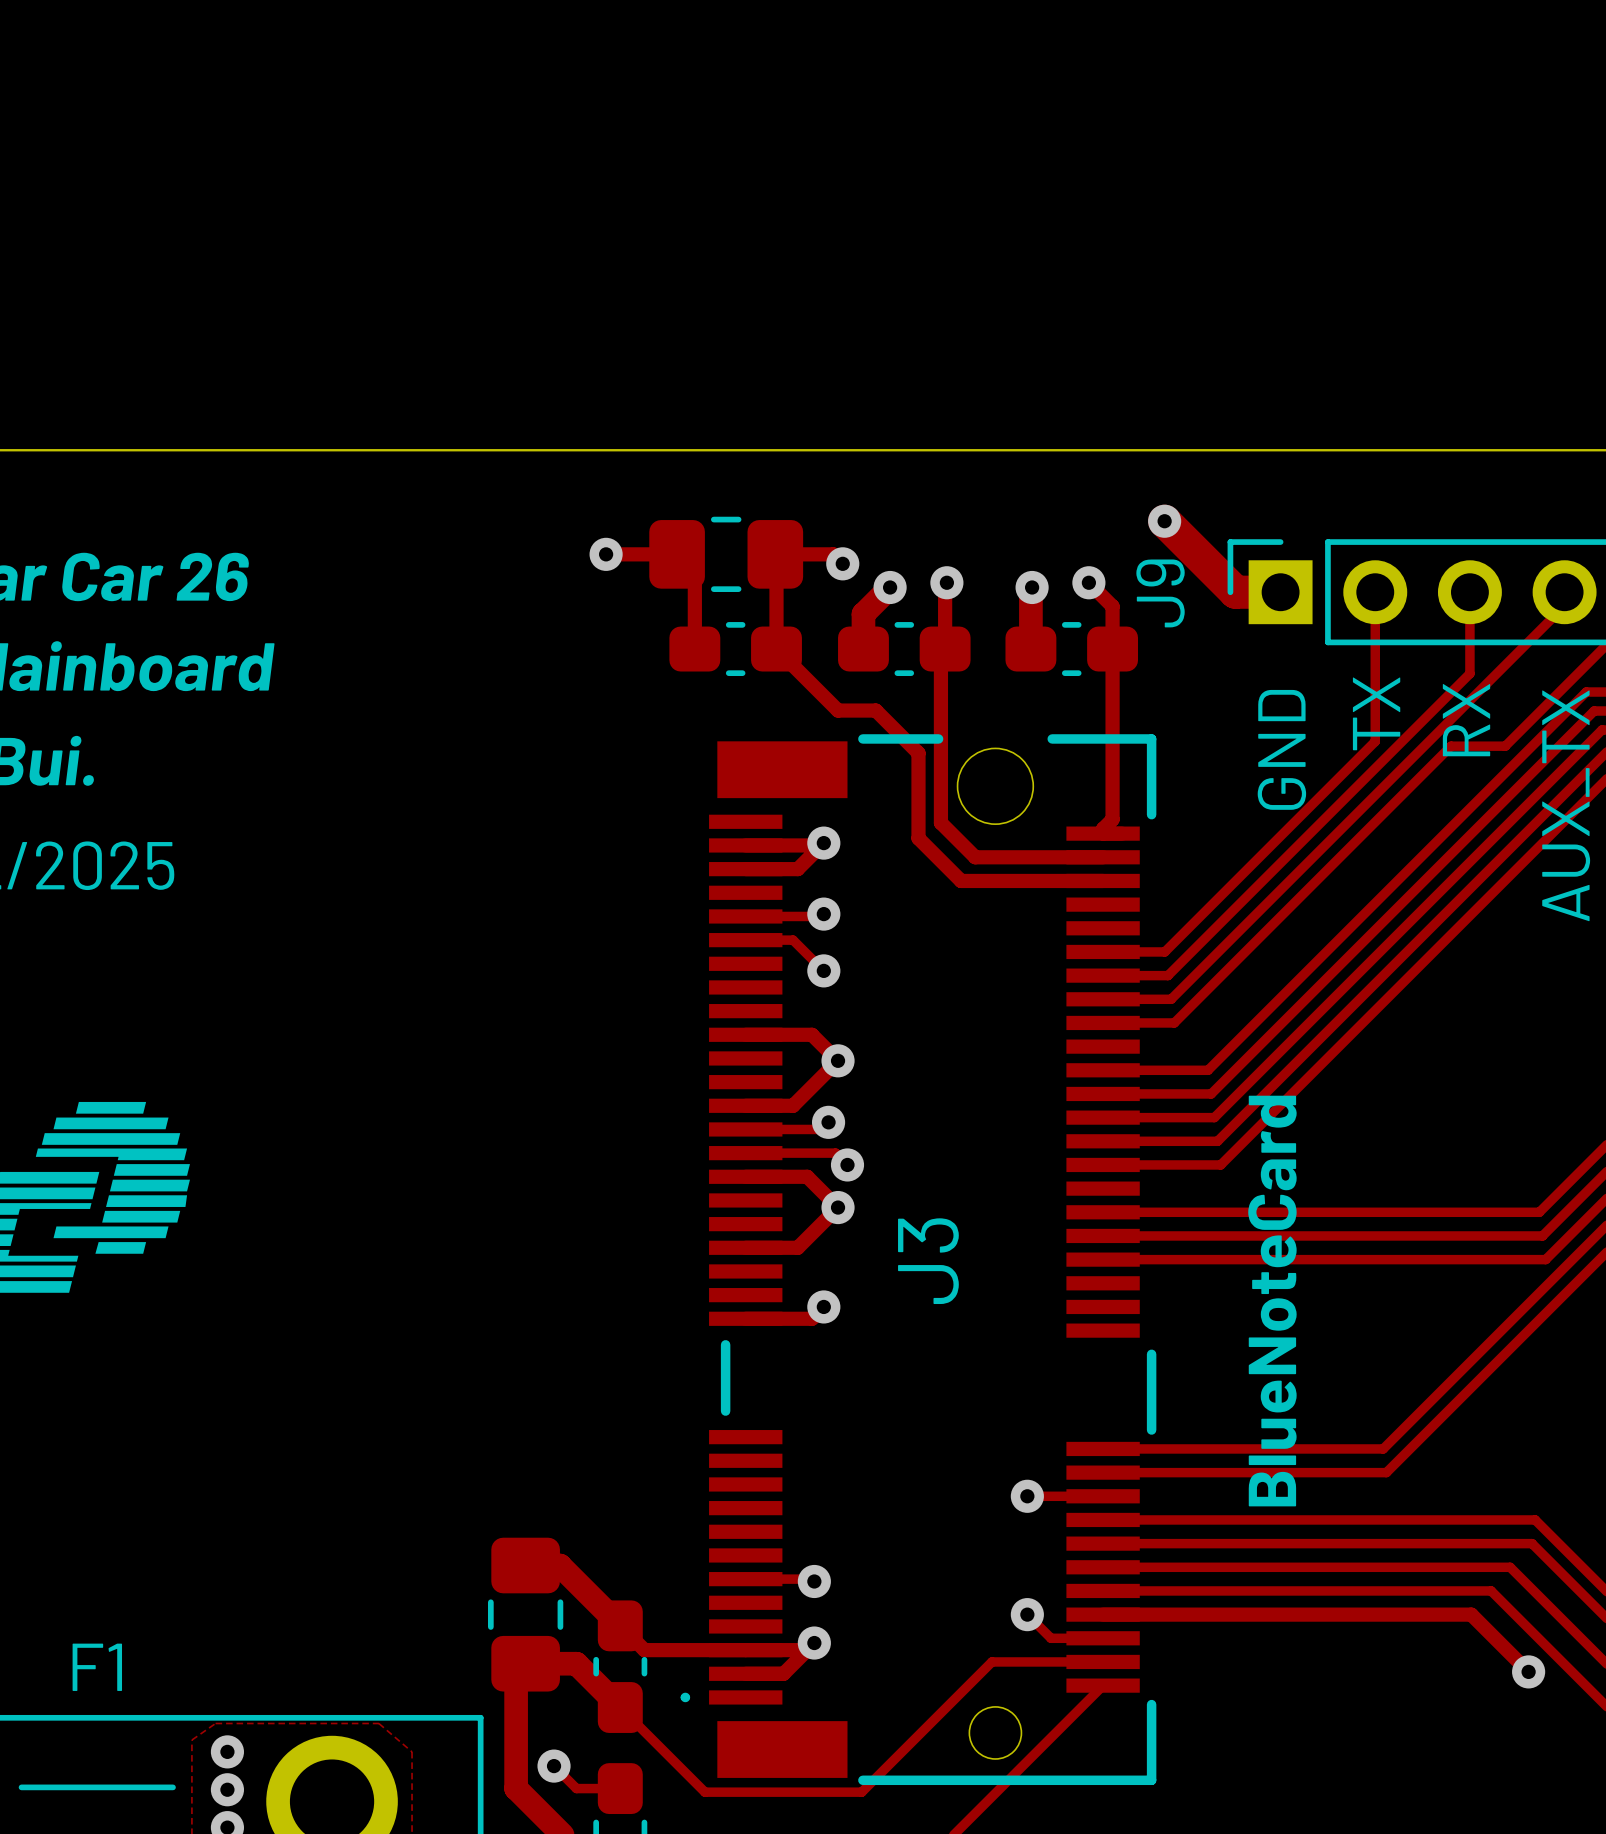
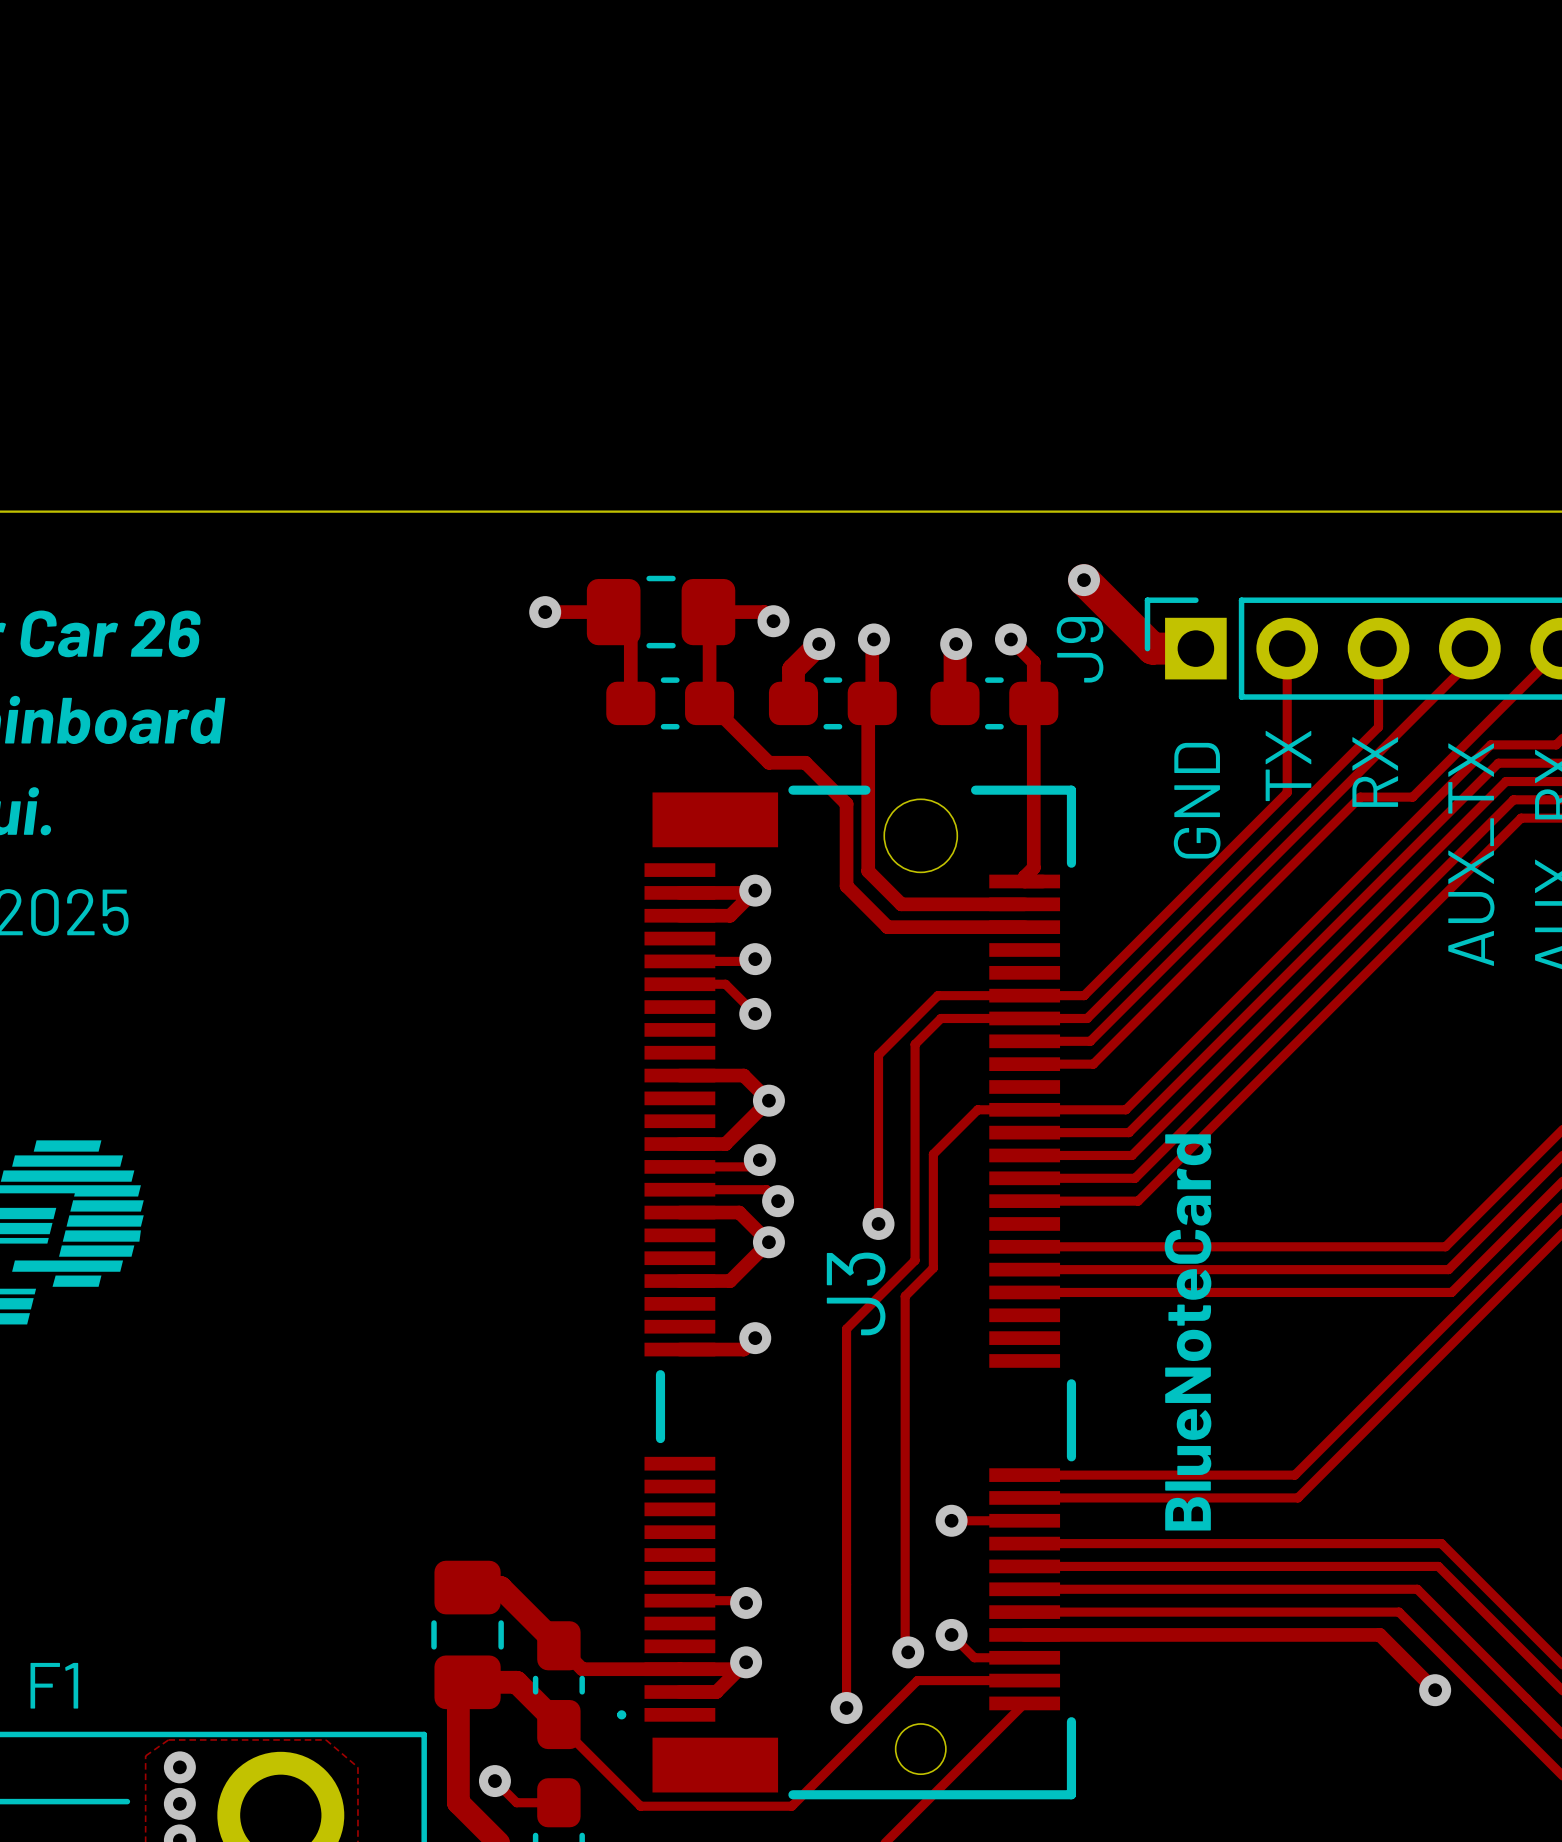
track: none -> (1024, 995) (937, 995) (878, 1055) (878, 1223)
track: none -> (1024, 1018) (940, 1018) (915, 1044) (915, 1260) (846, 1328) (846, 1707)
track: none -> (1024, 1109) (977, 1109) (933, 1154) (933, 1268) (905, 1296) (905, 1649) (908, 1652)
via: none -> (878, 1223)
via: none -> (908, 1652)
via: none -> (846, 1707)

